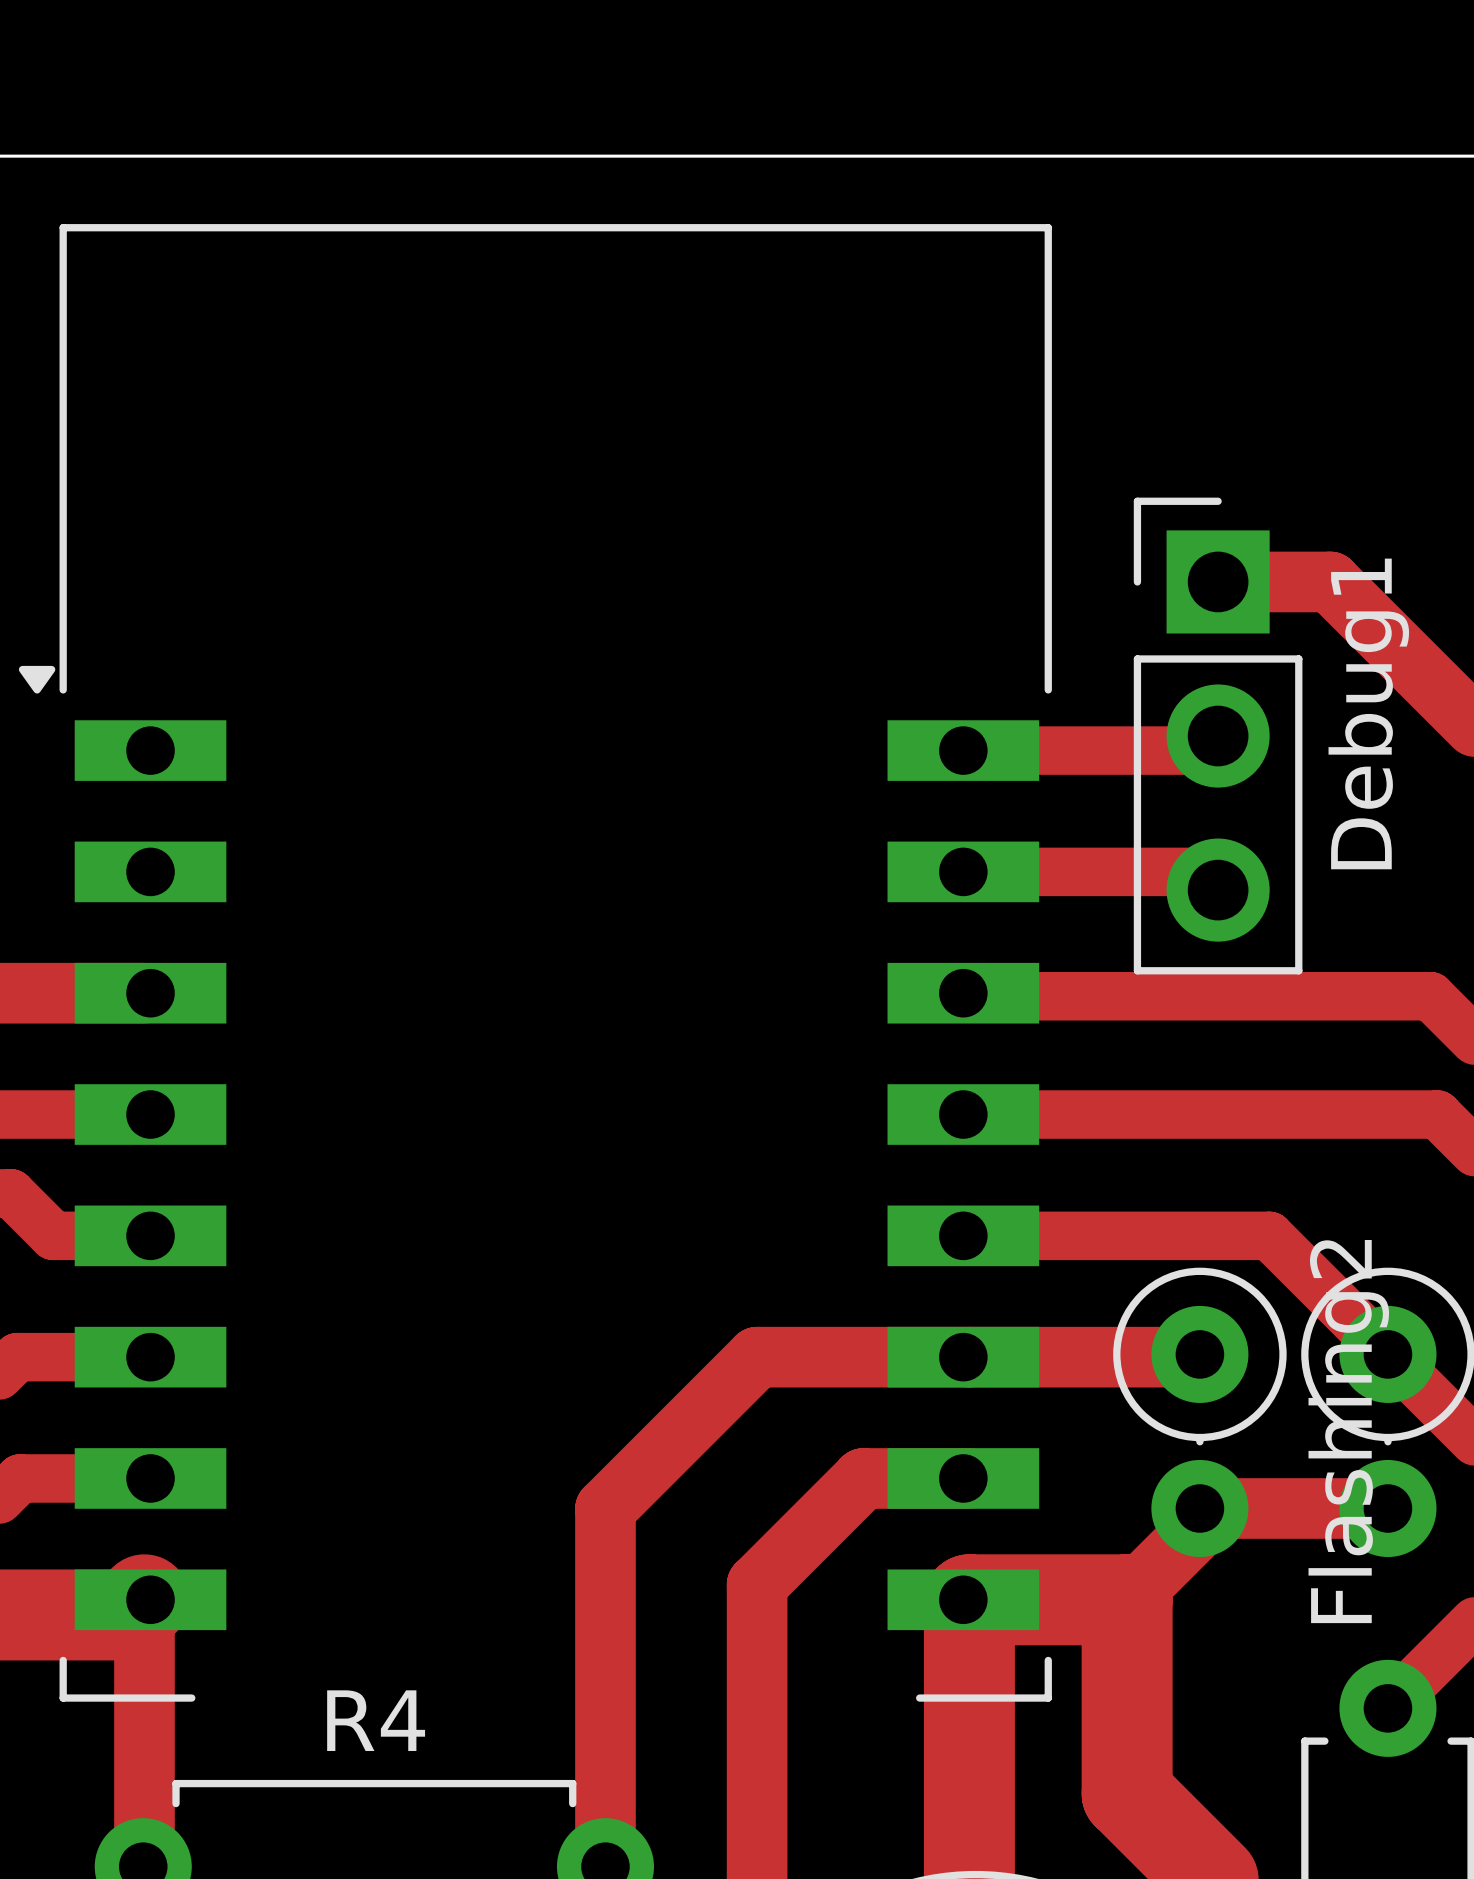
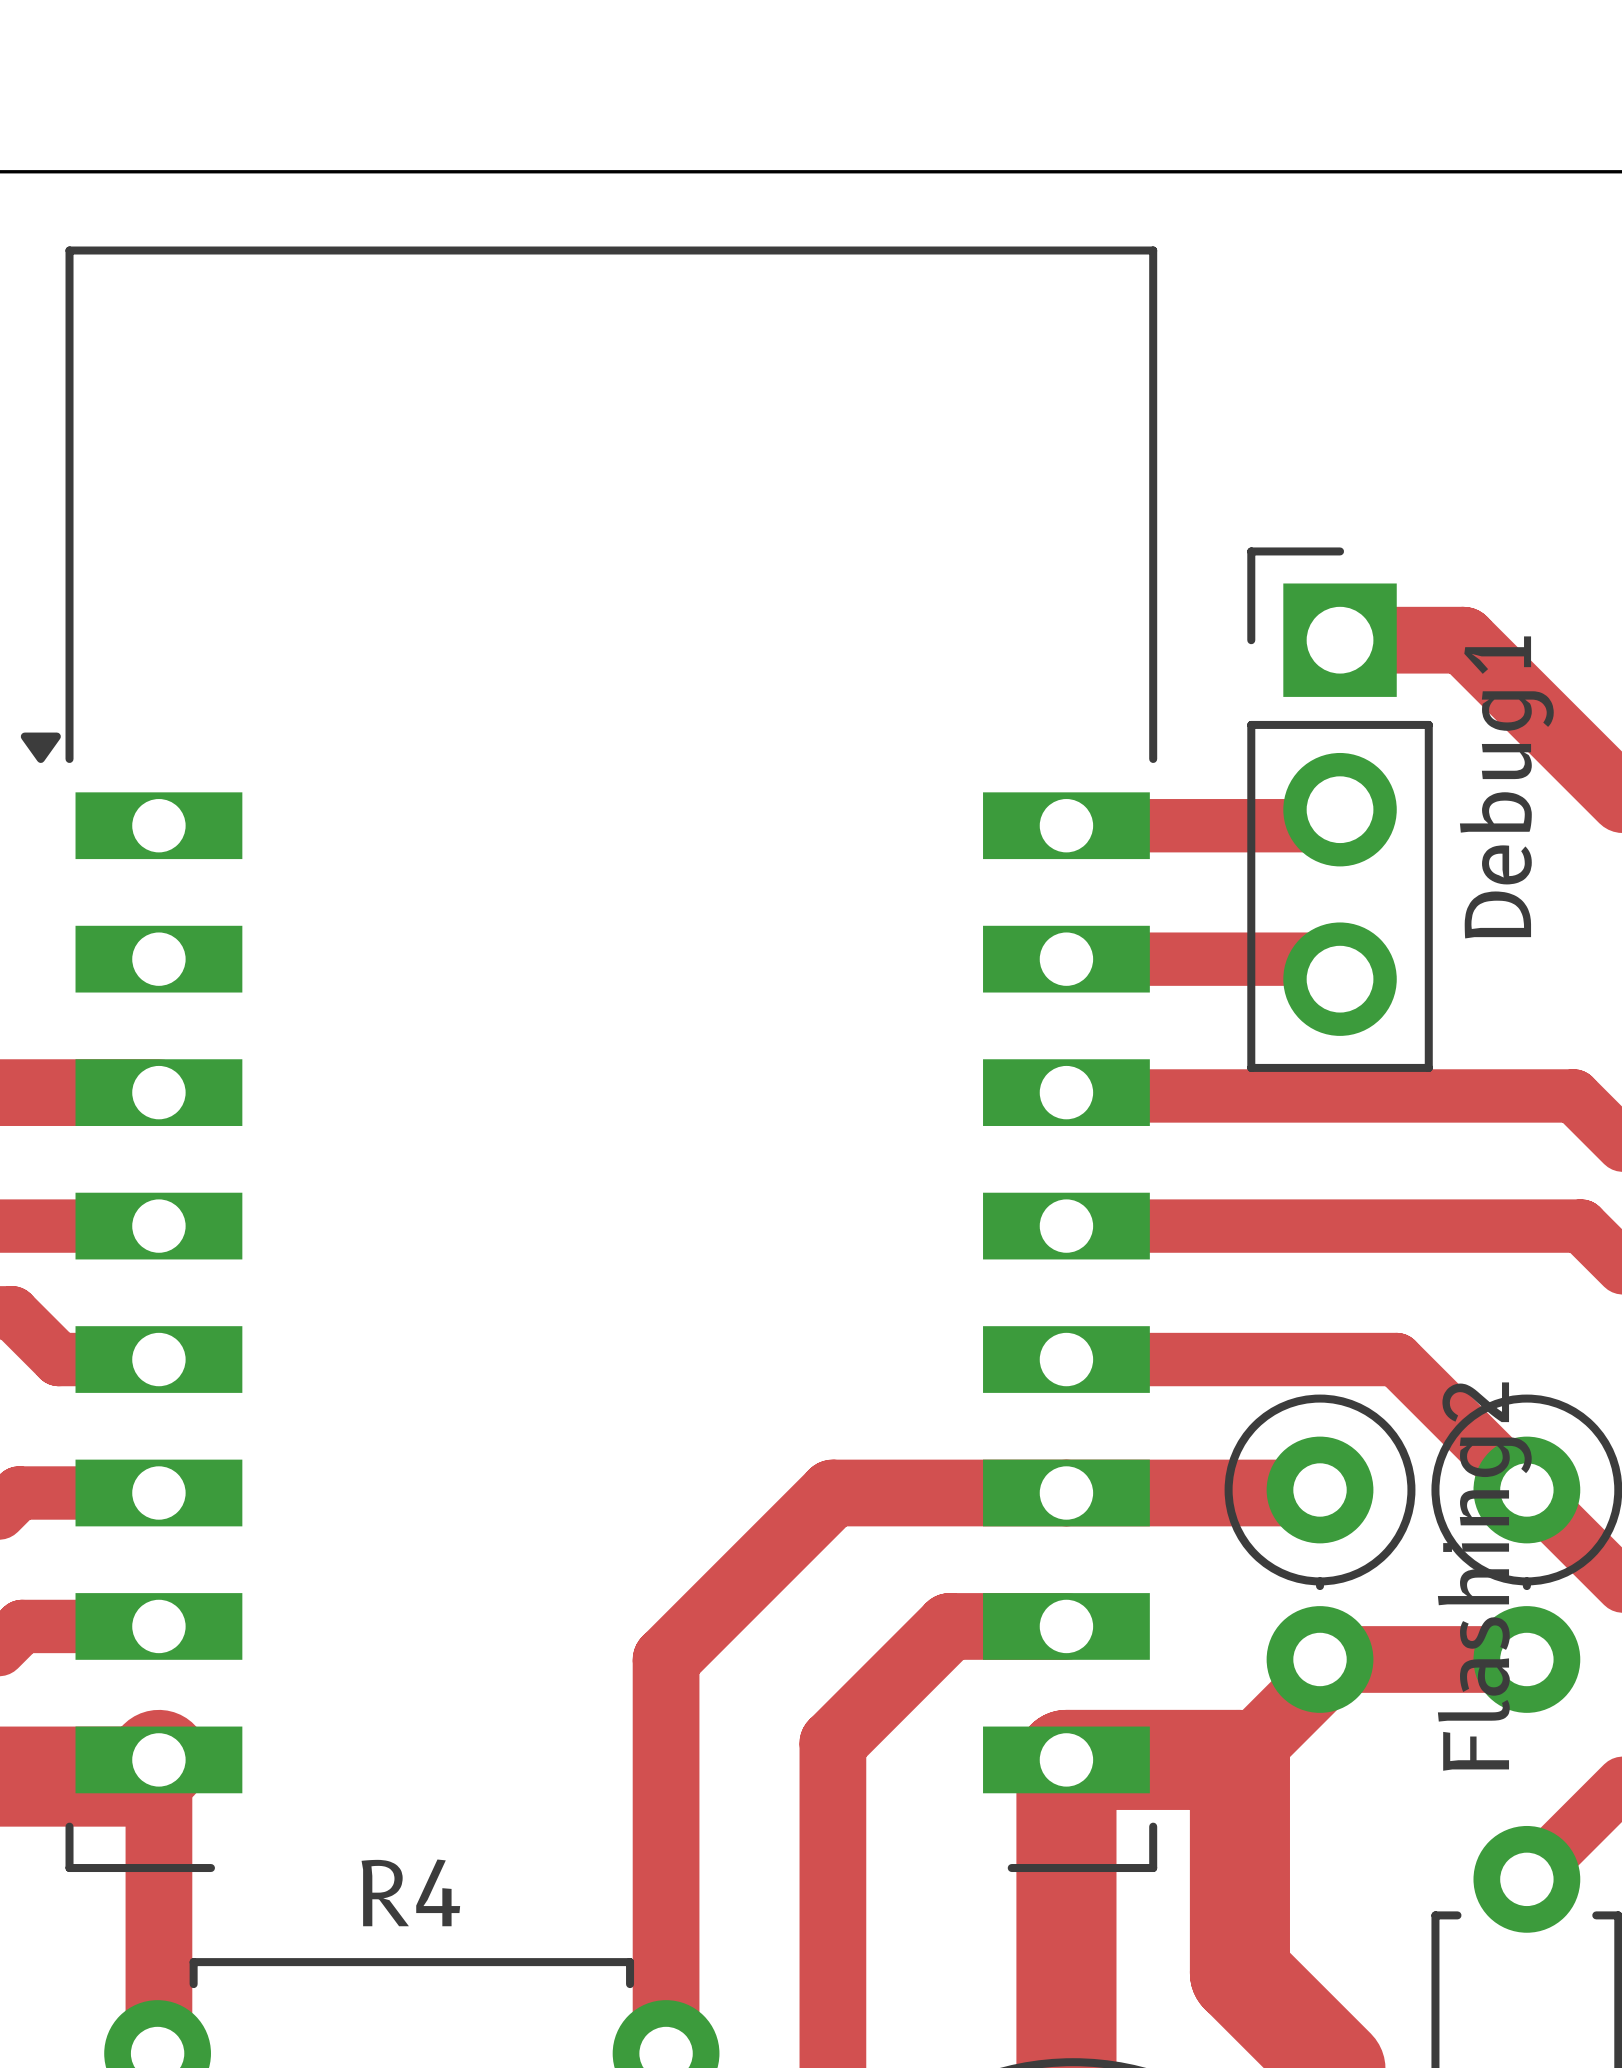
part footprint: [18, 224, 1052, 1702] -> [20, 246, 1158, 1873]

